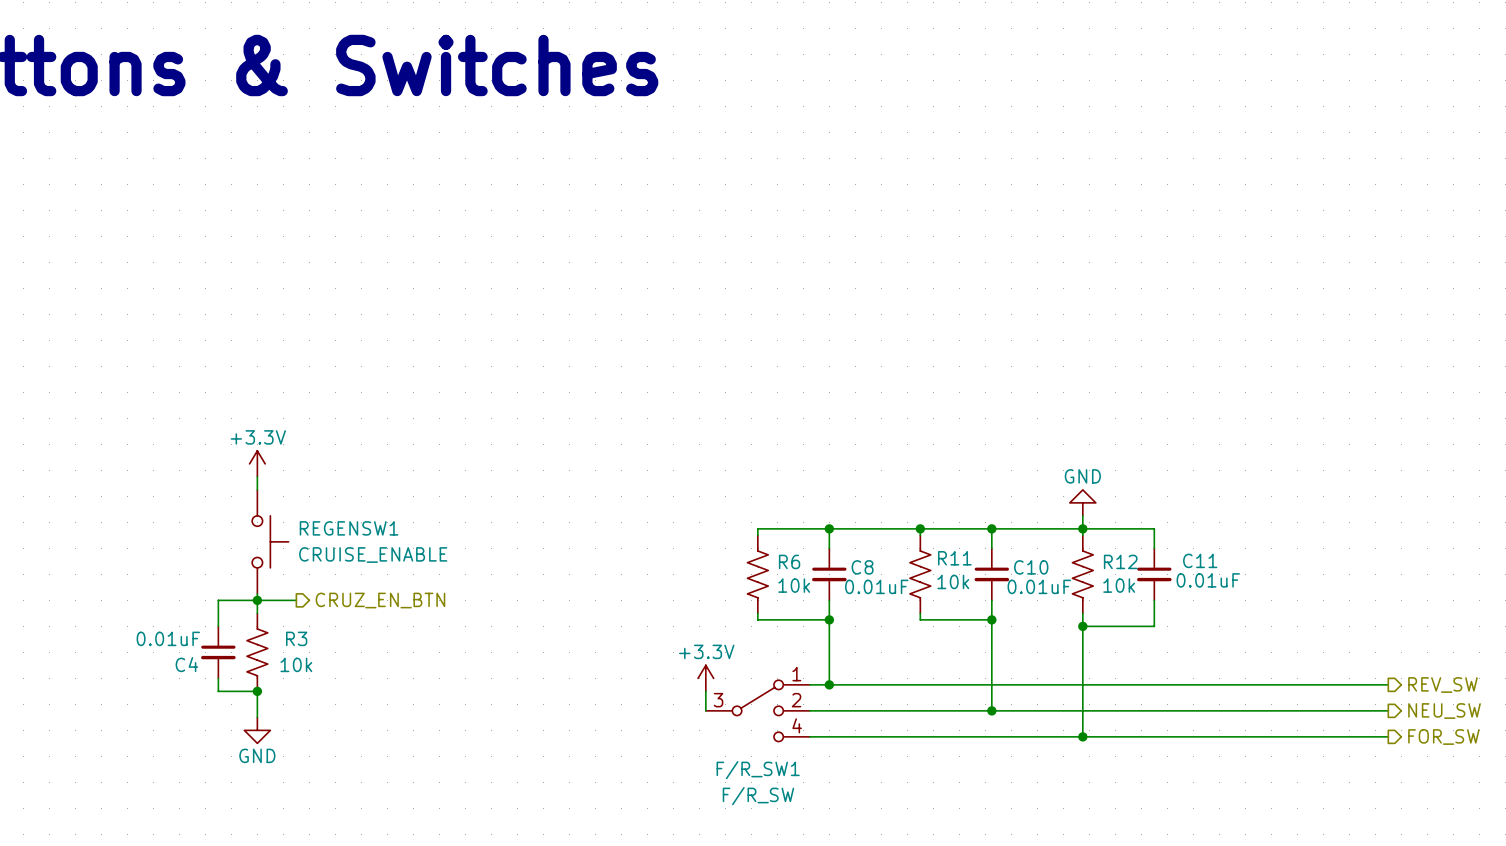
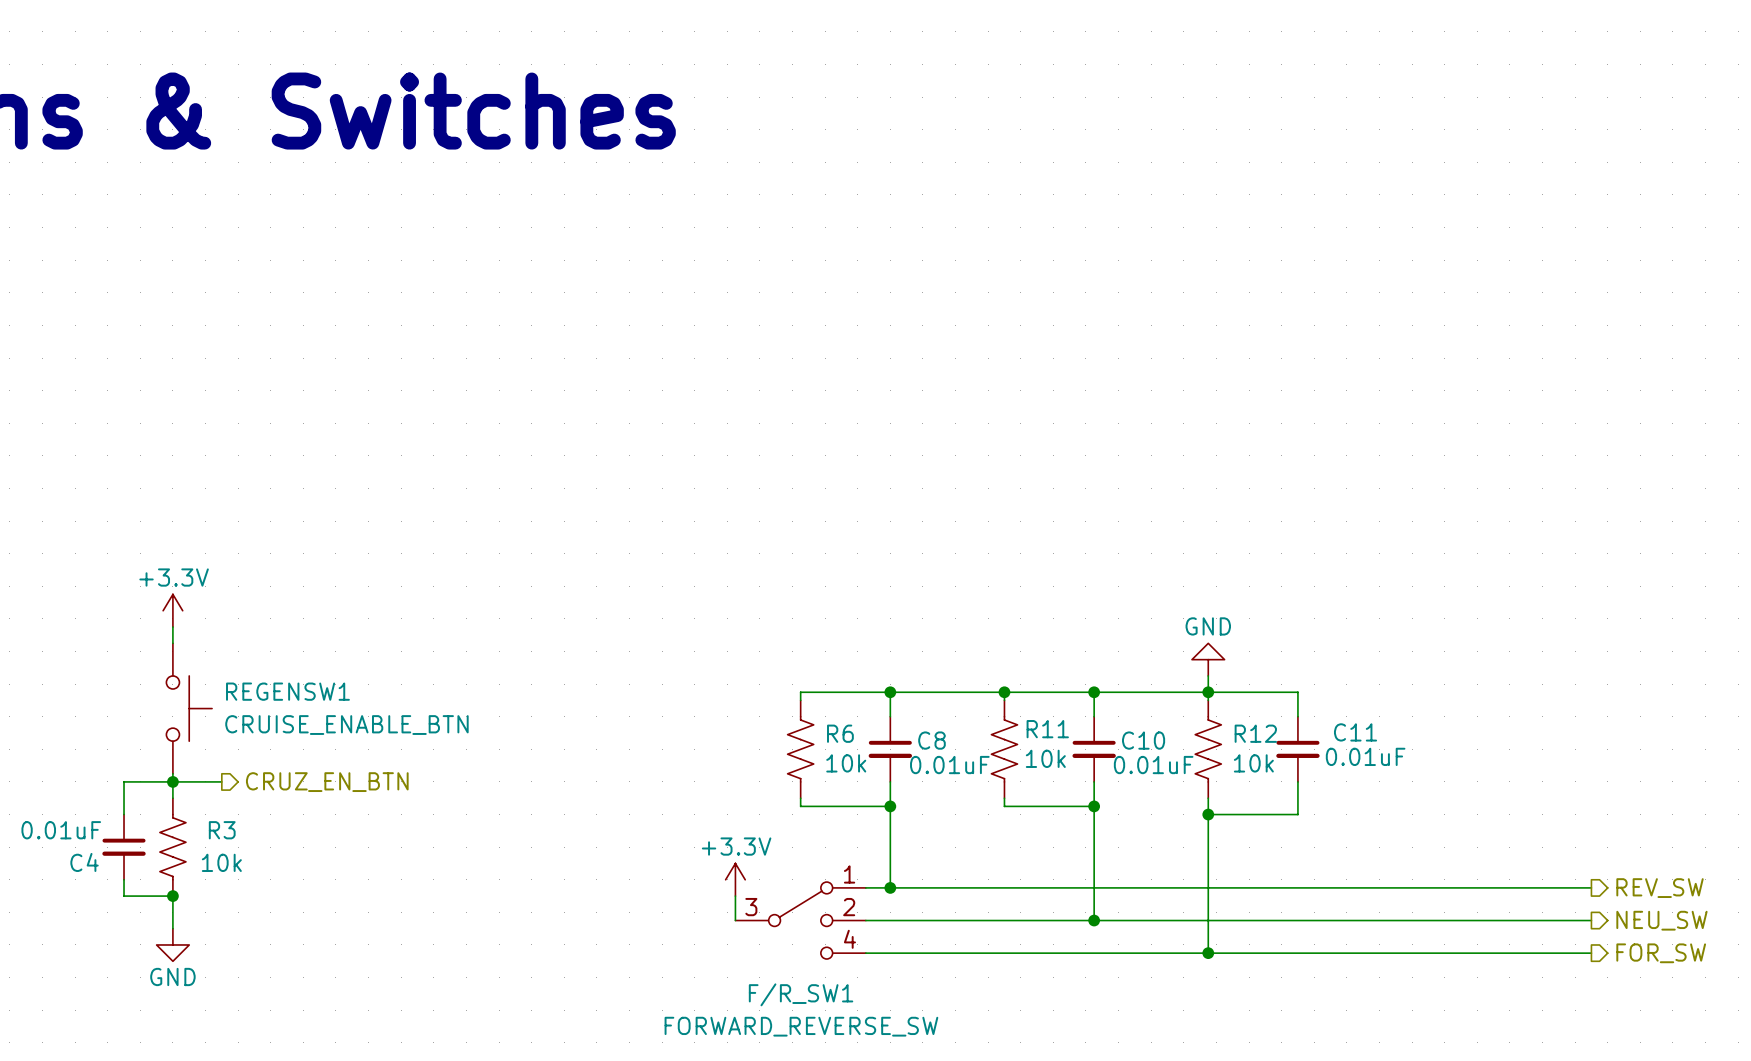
REGENSW1 value: CRUISE_ENABLE (373, 555) -> CRUISE_ENABLE_BTN (346, 725)
F/R_SW1 value: F/R_SW (758, 796) -> FORWARD_REVERSE_SW (801, 1026)

